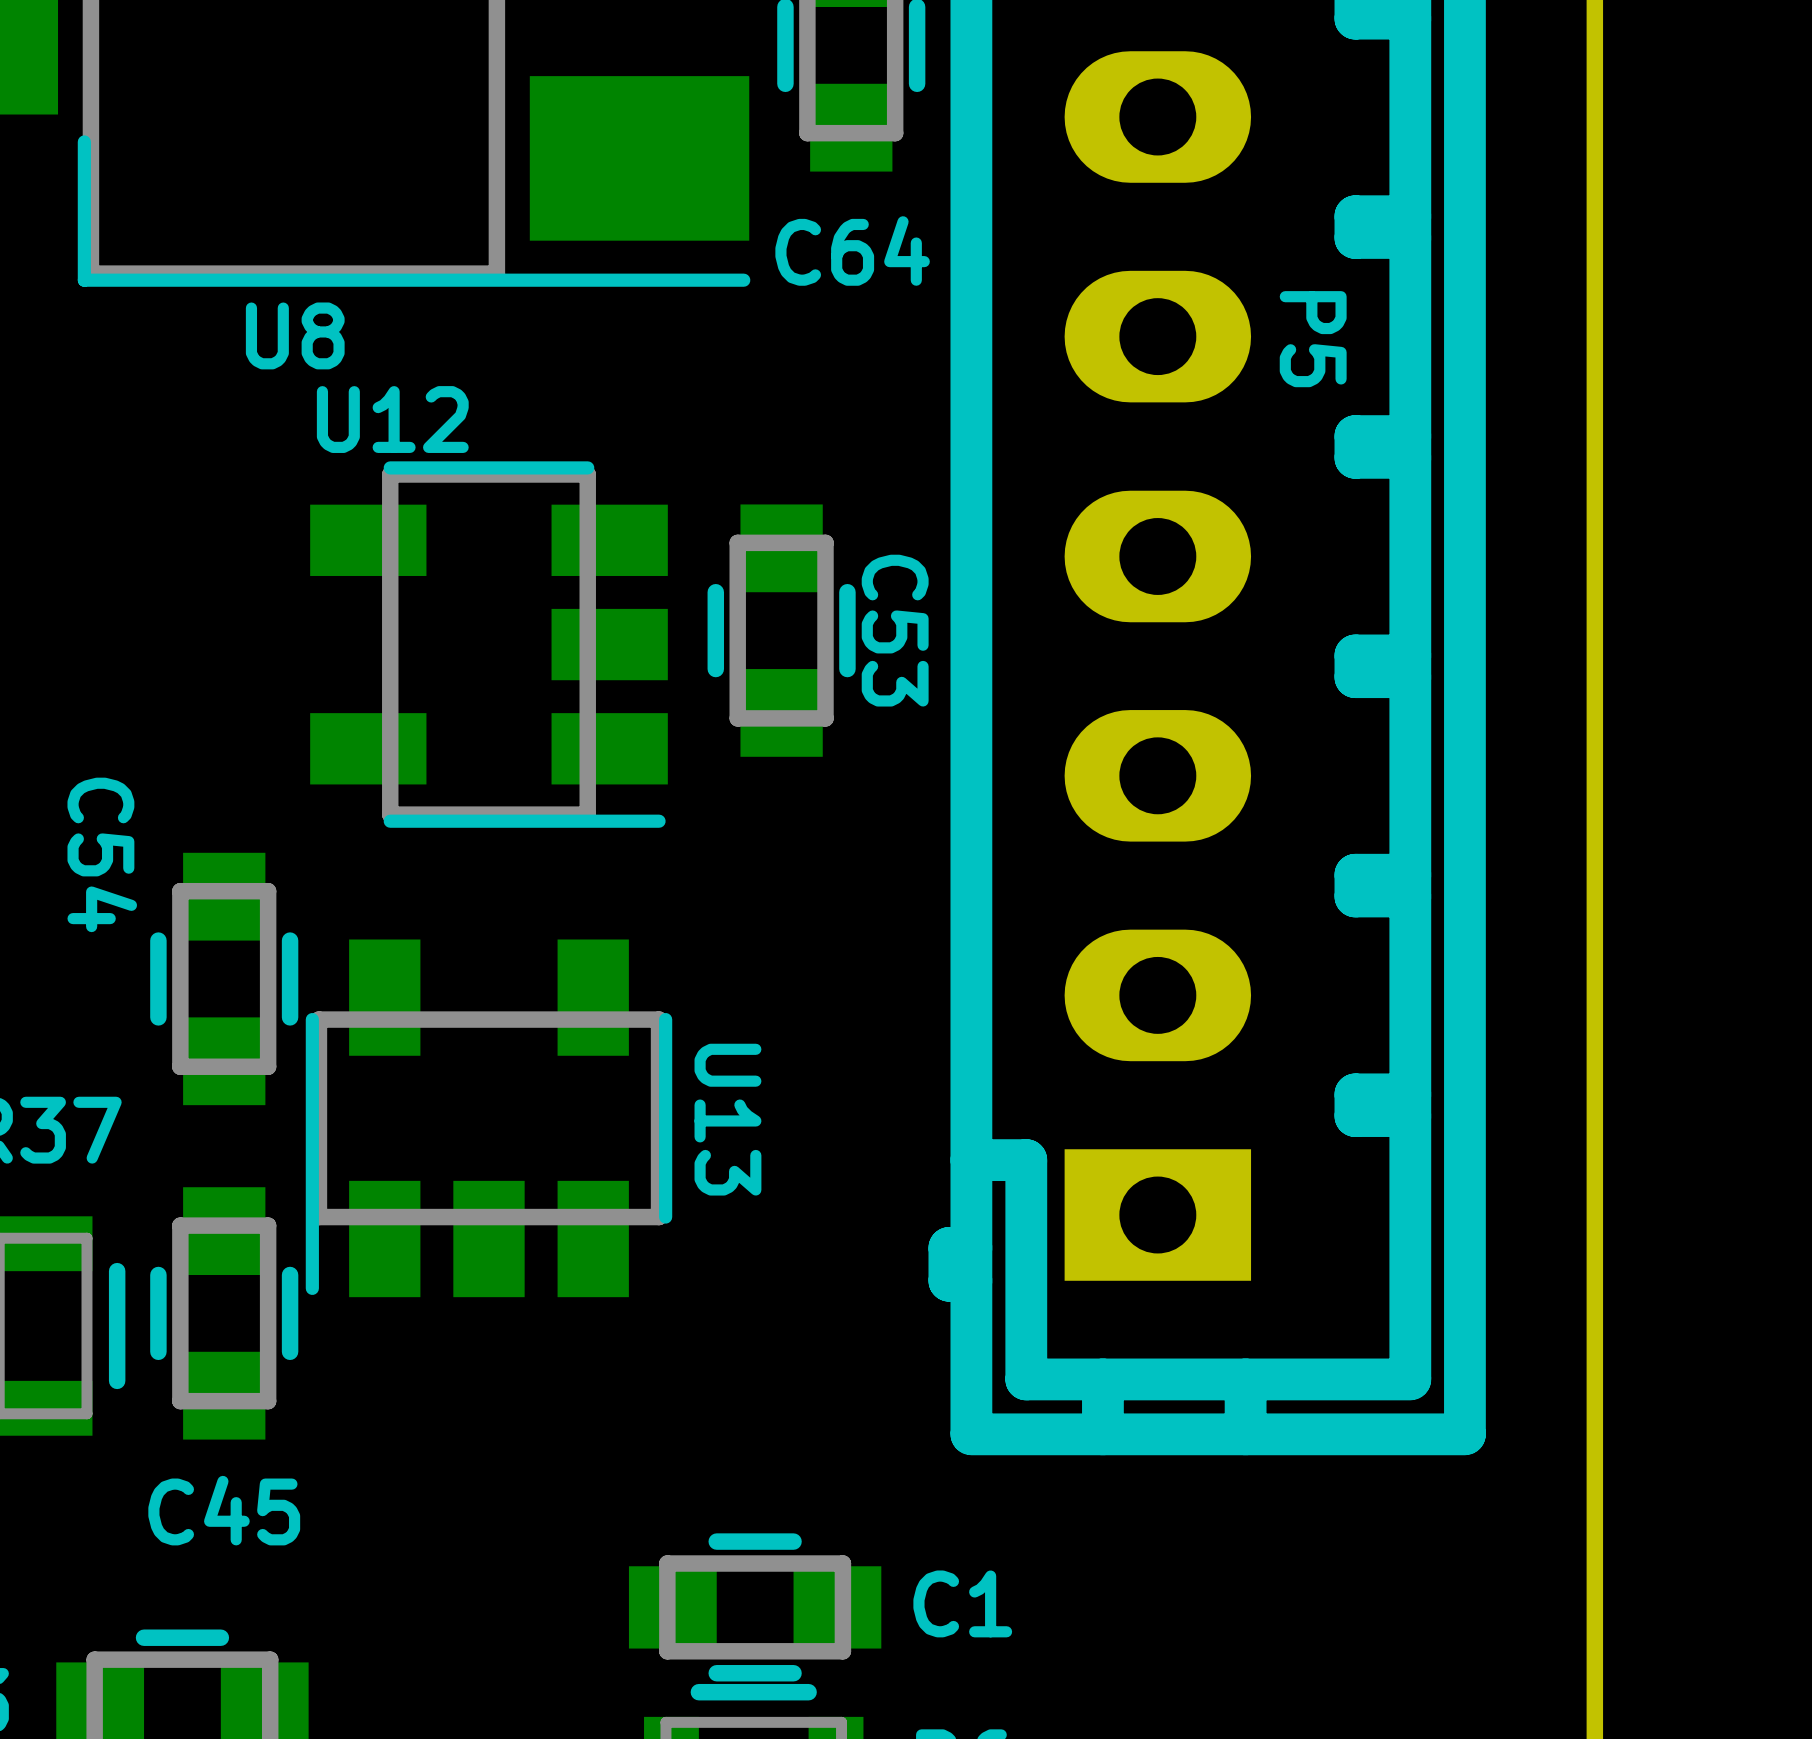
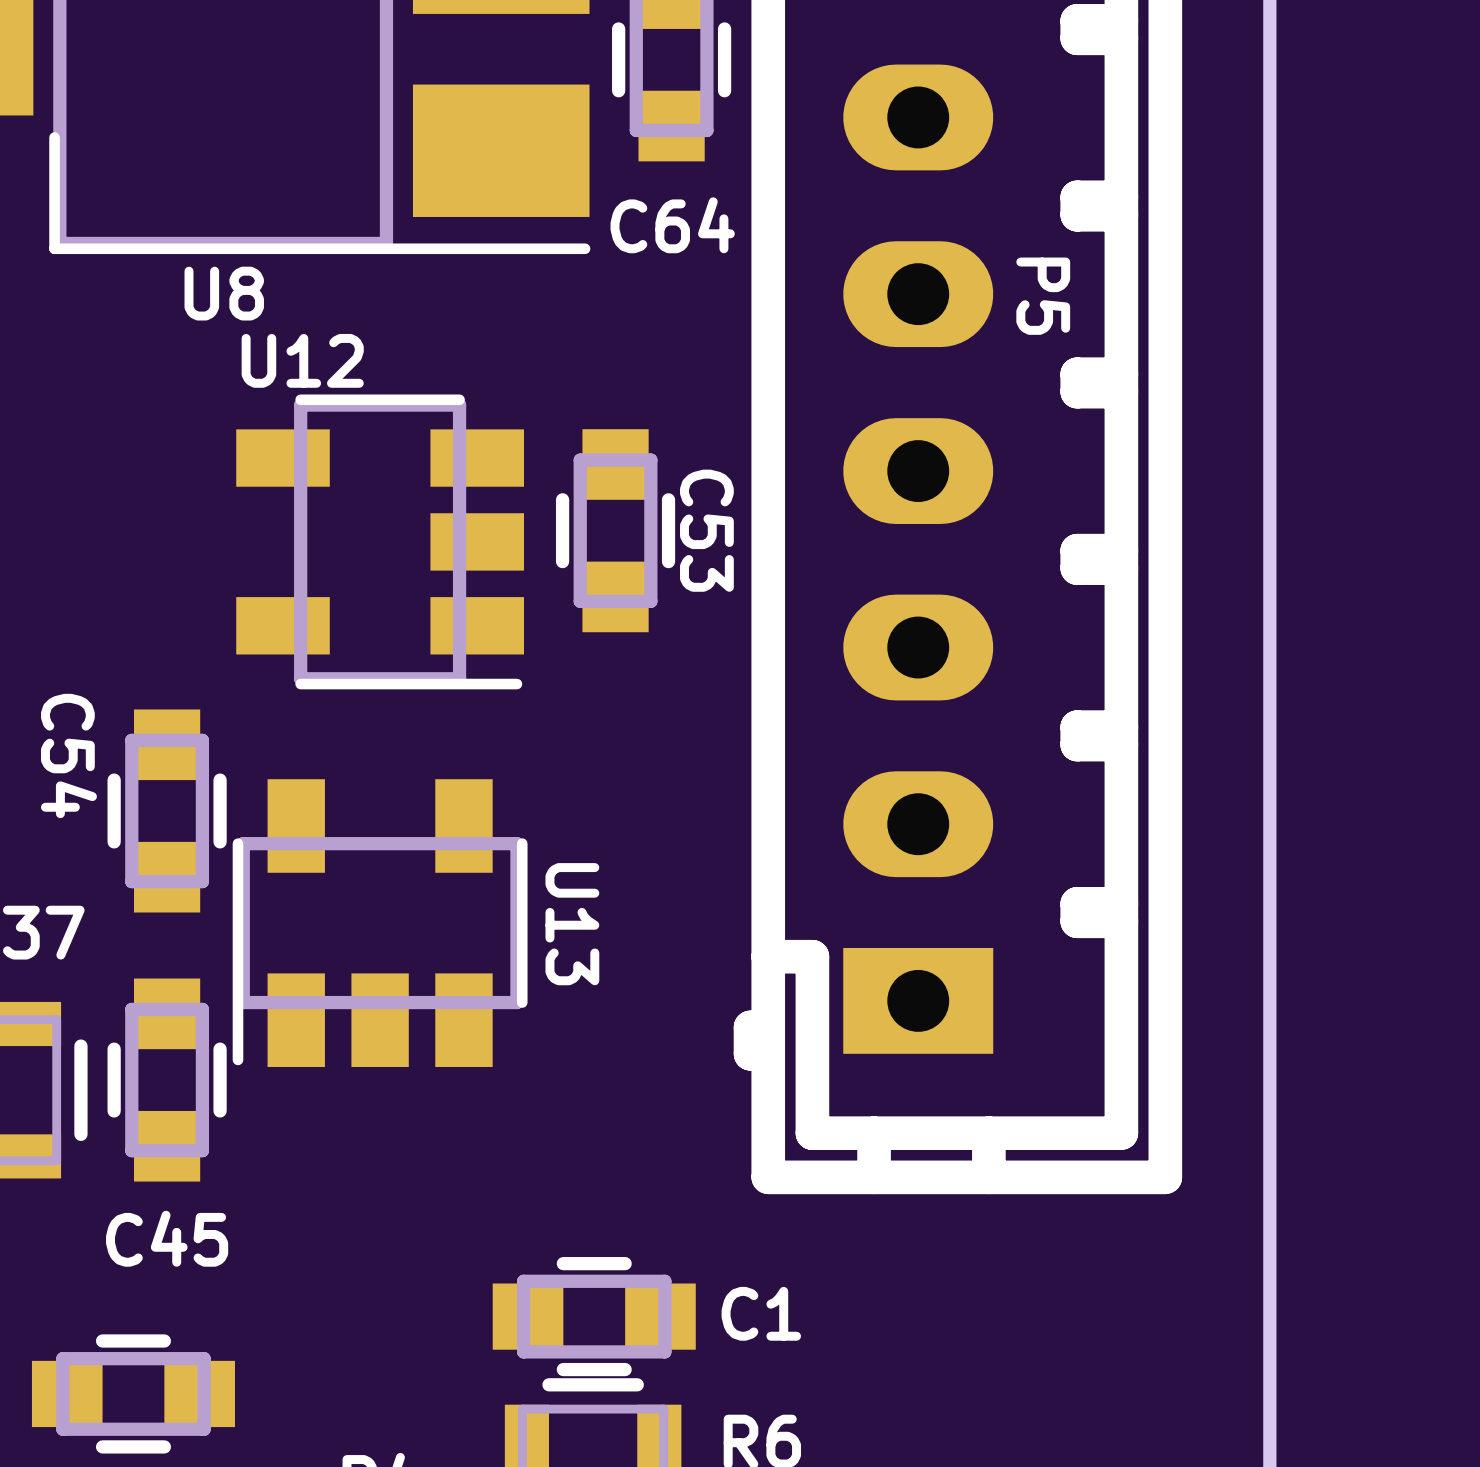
C54 name position: C54 (102, 854) -> C54 (68, 756)

